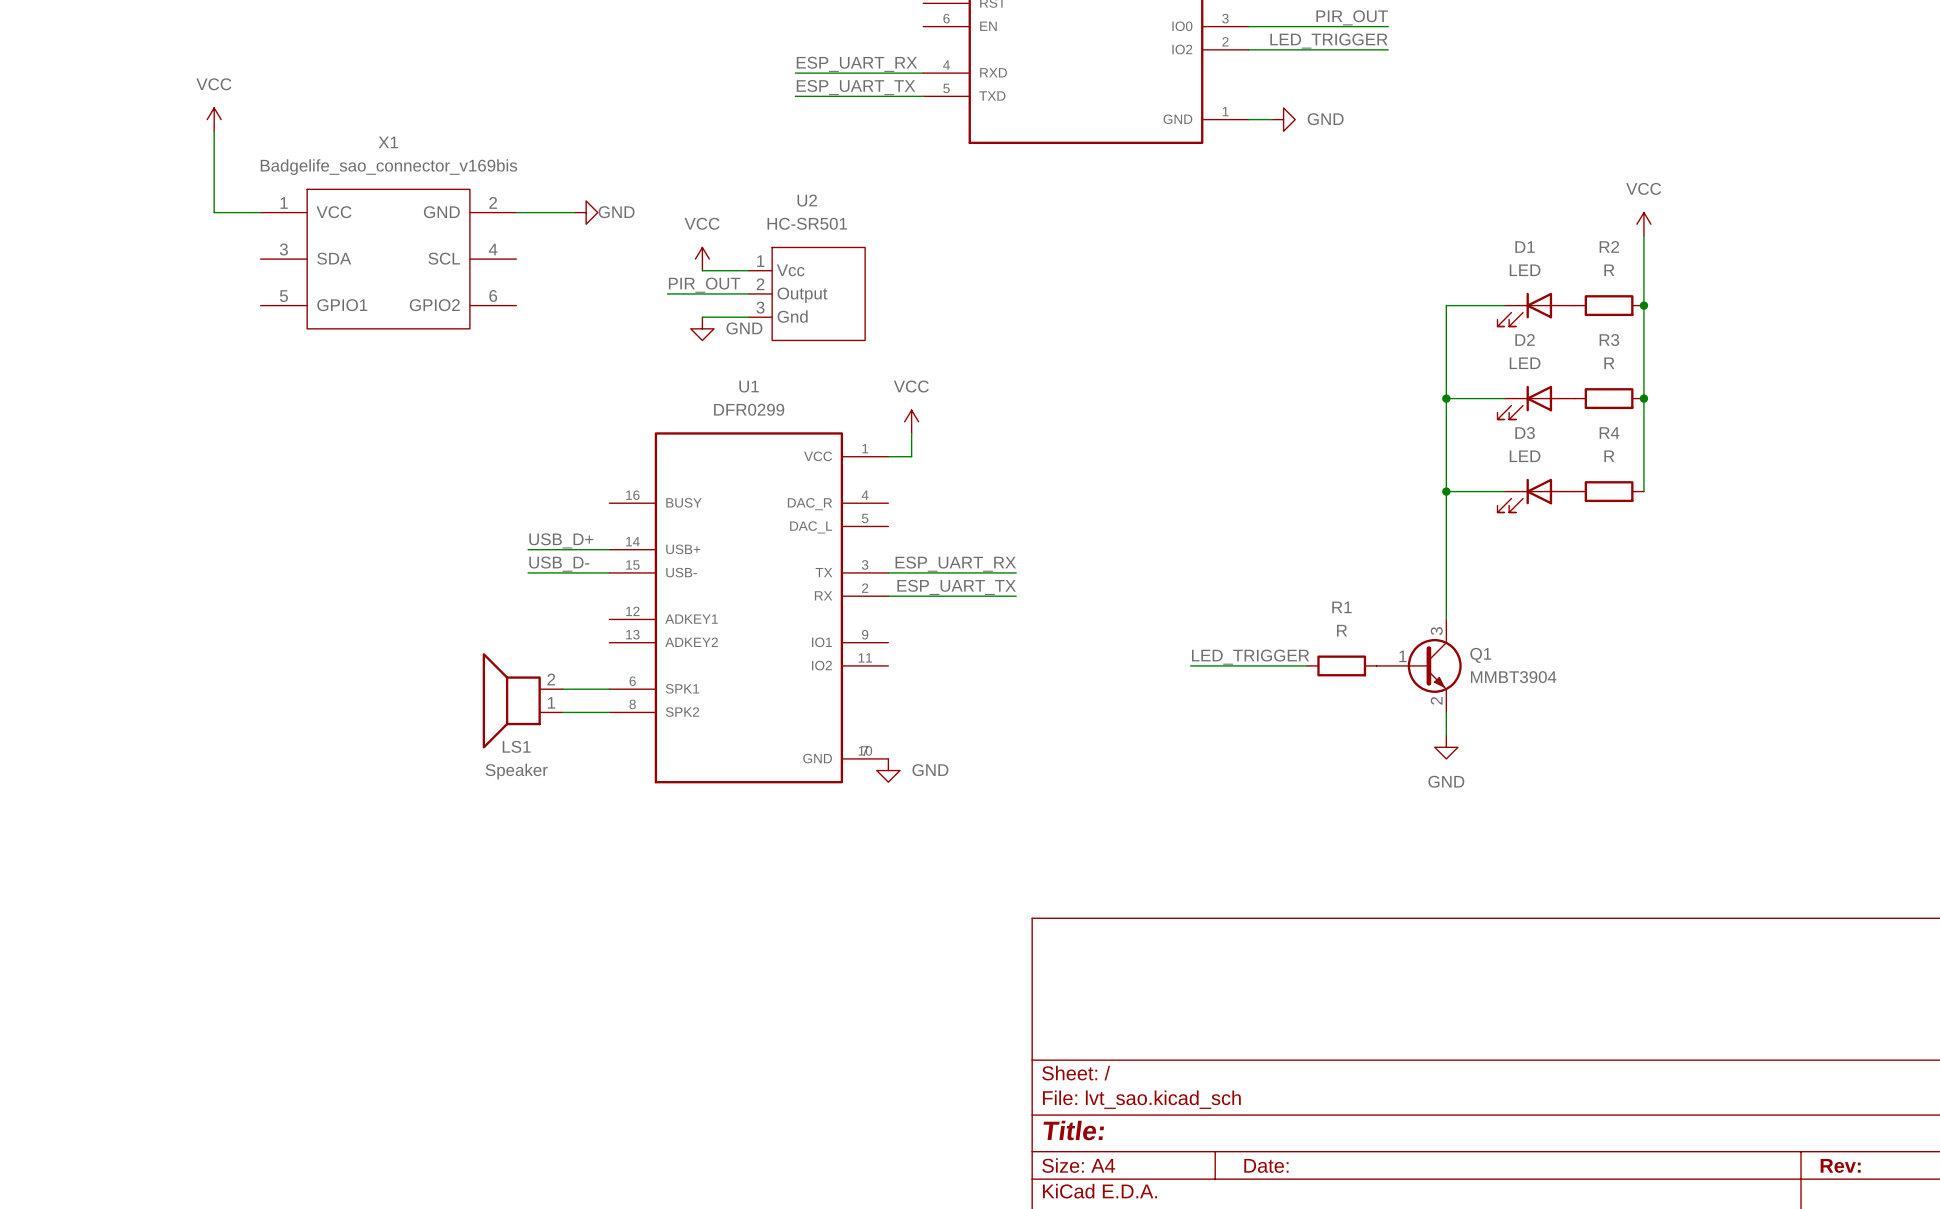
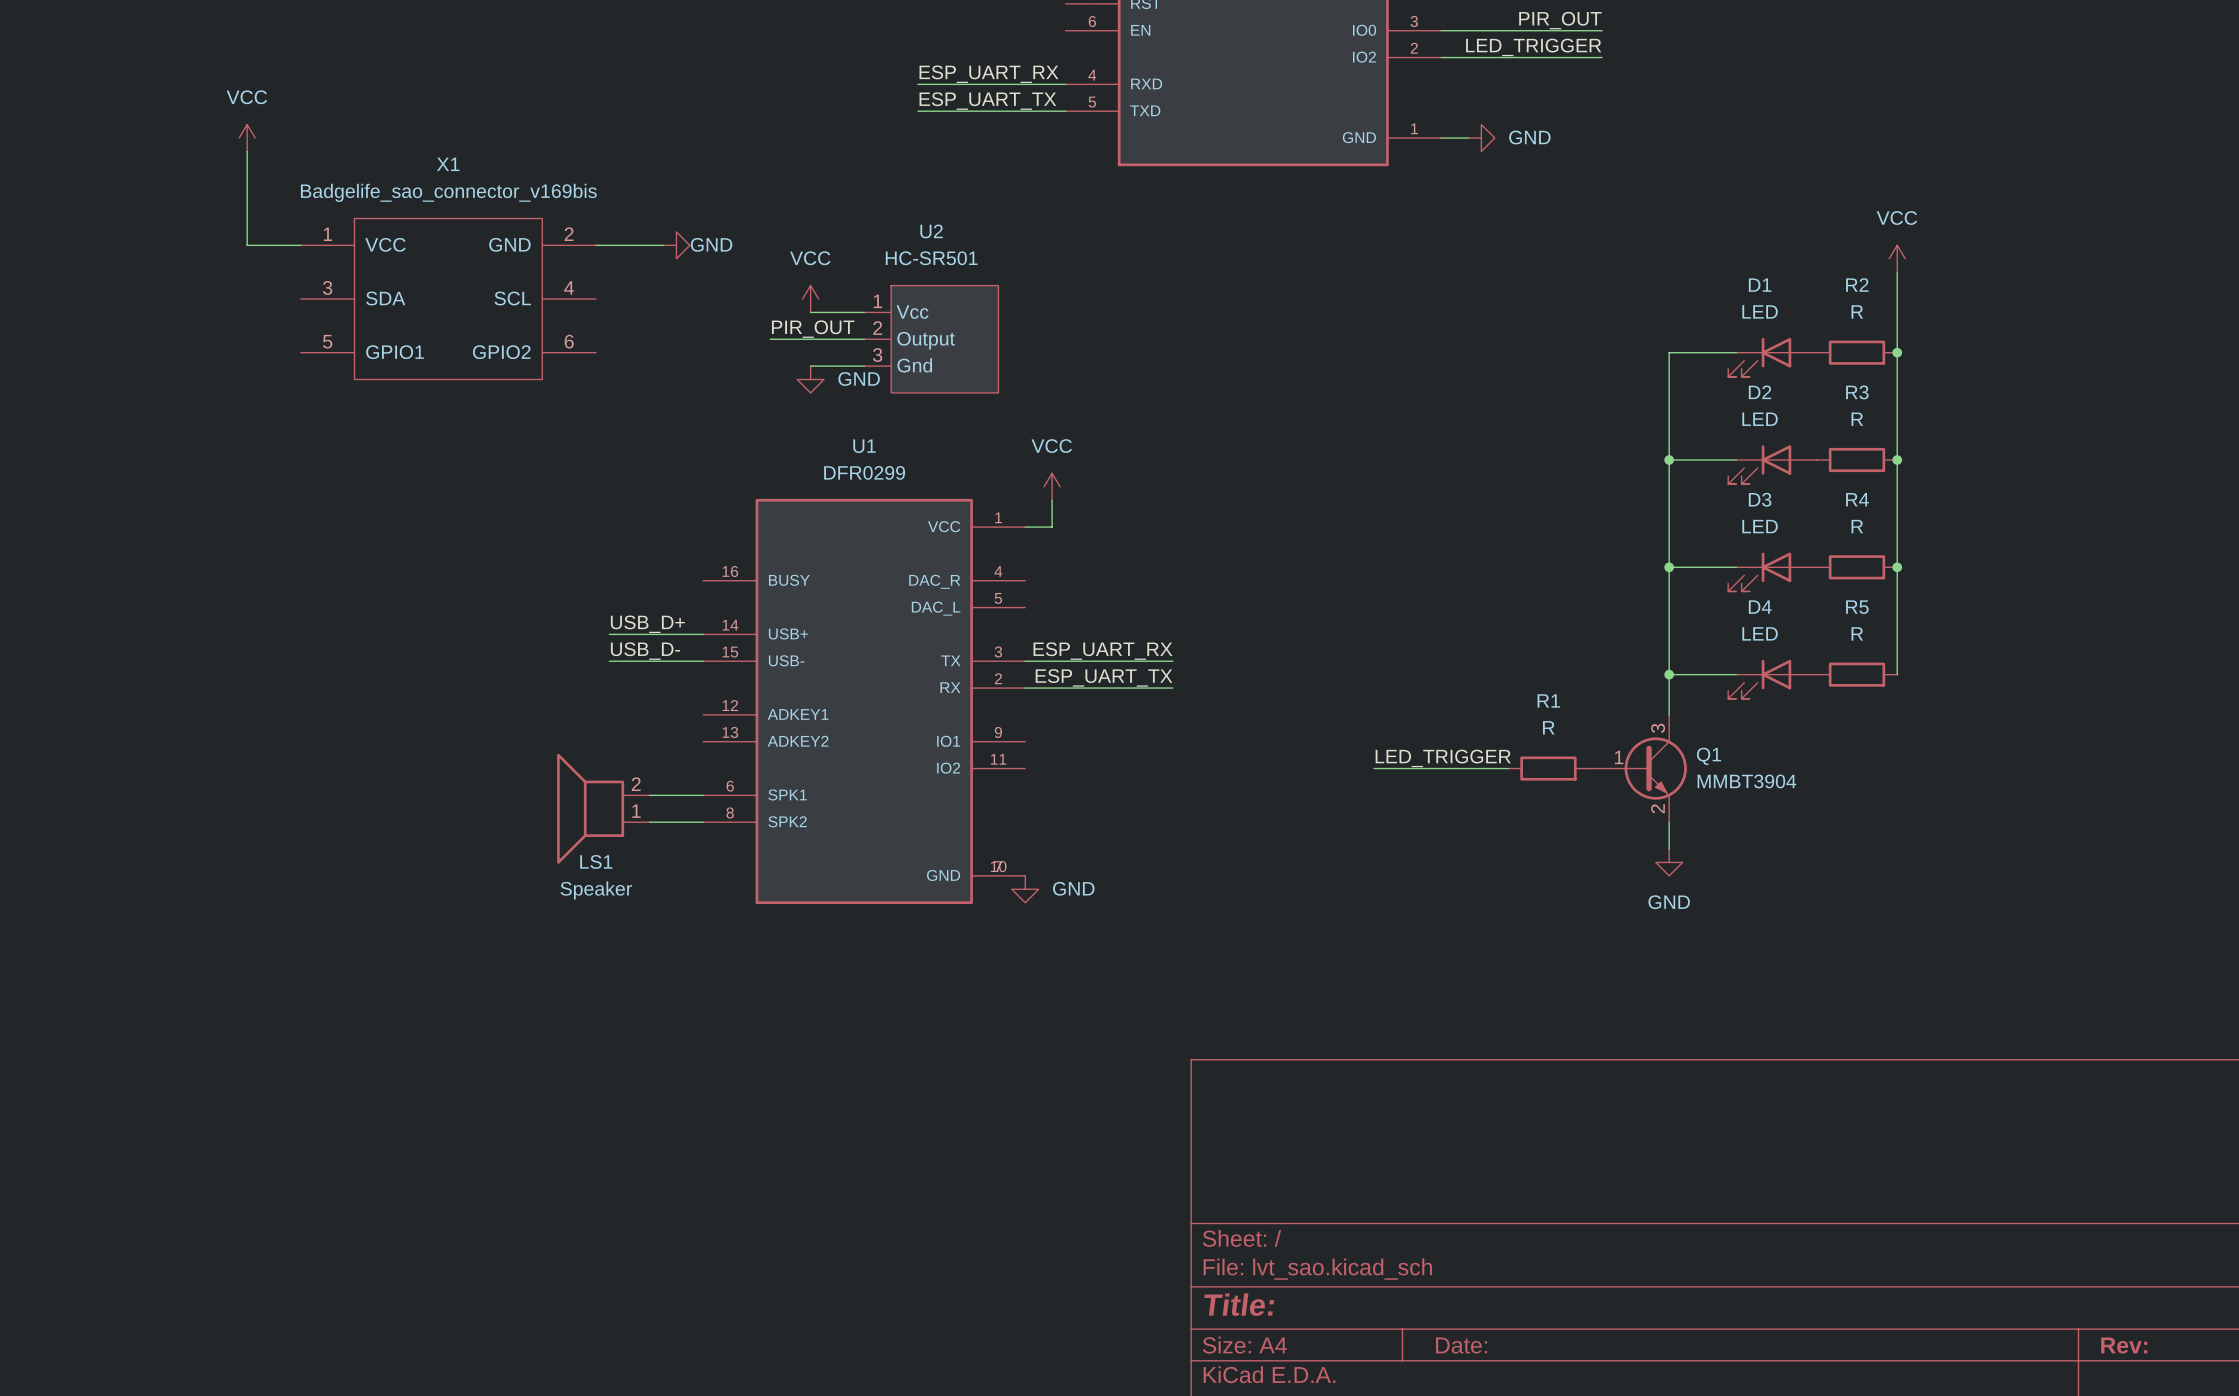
wire: none -> (1897, 567) (1897, 674)
junction: none -> (1897, 567)
wire: none -> (1669, 674) (1736, 674)
junction: none -> (1669, 674)
R5: none -> R (1856, 674)
D4: none -> LED (1772, 679)

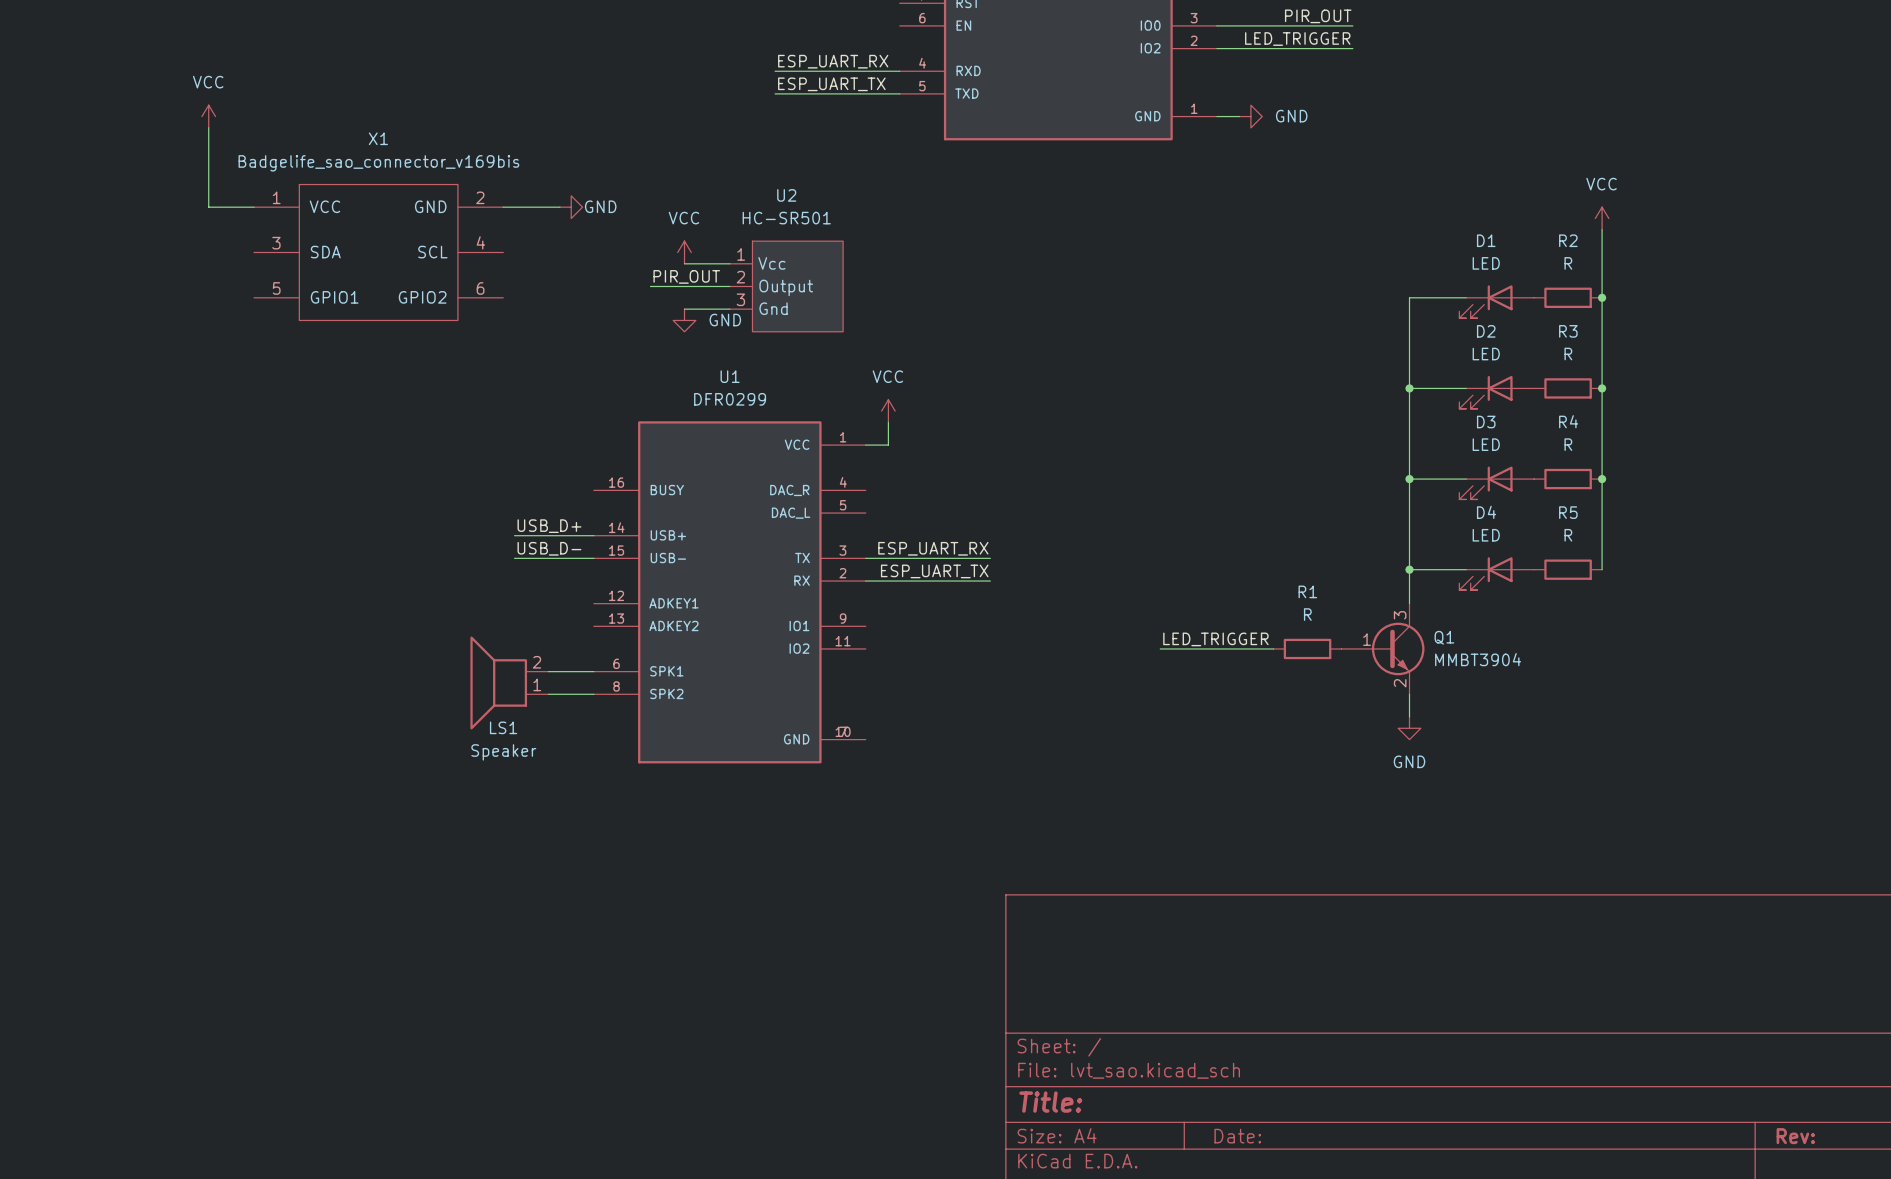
power symbol: GND (1025, 889) -> none

